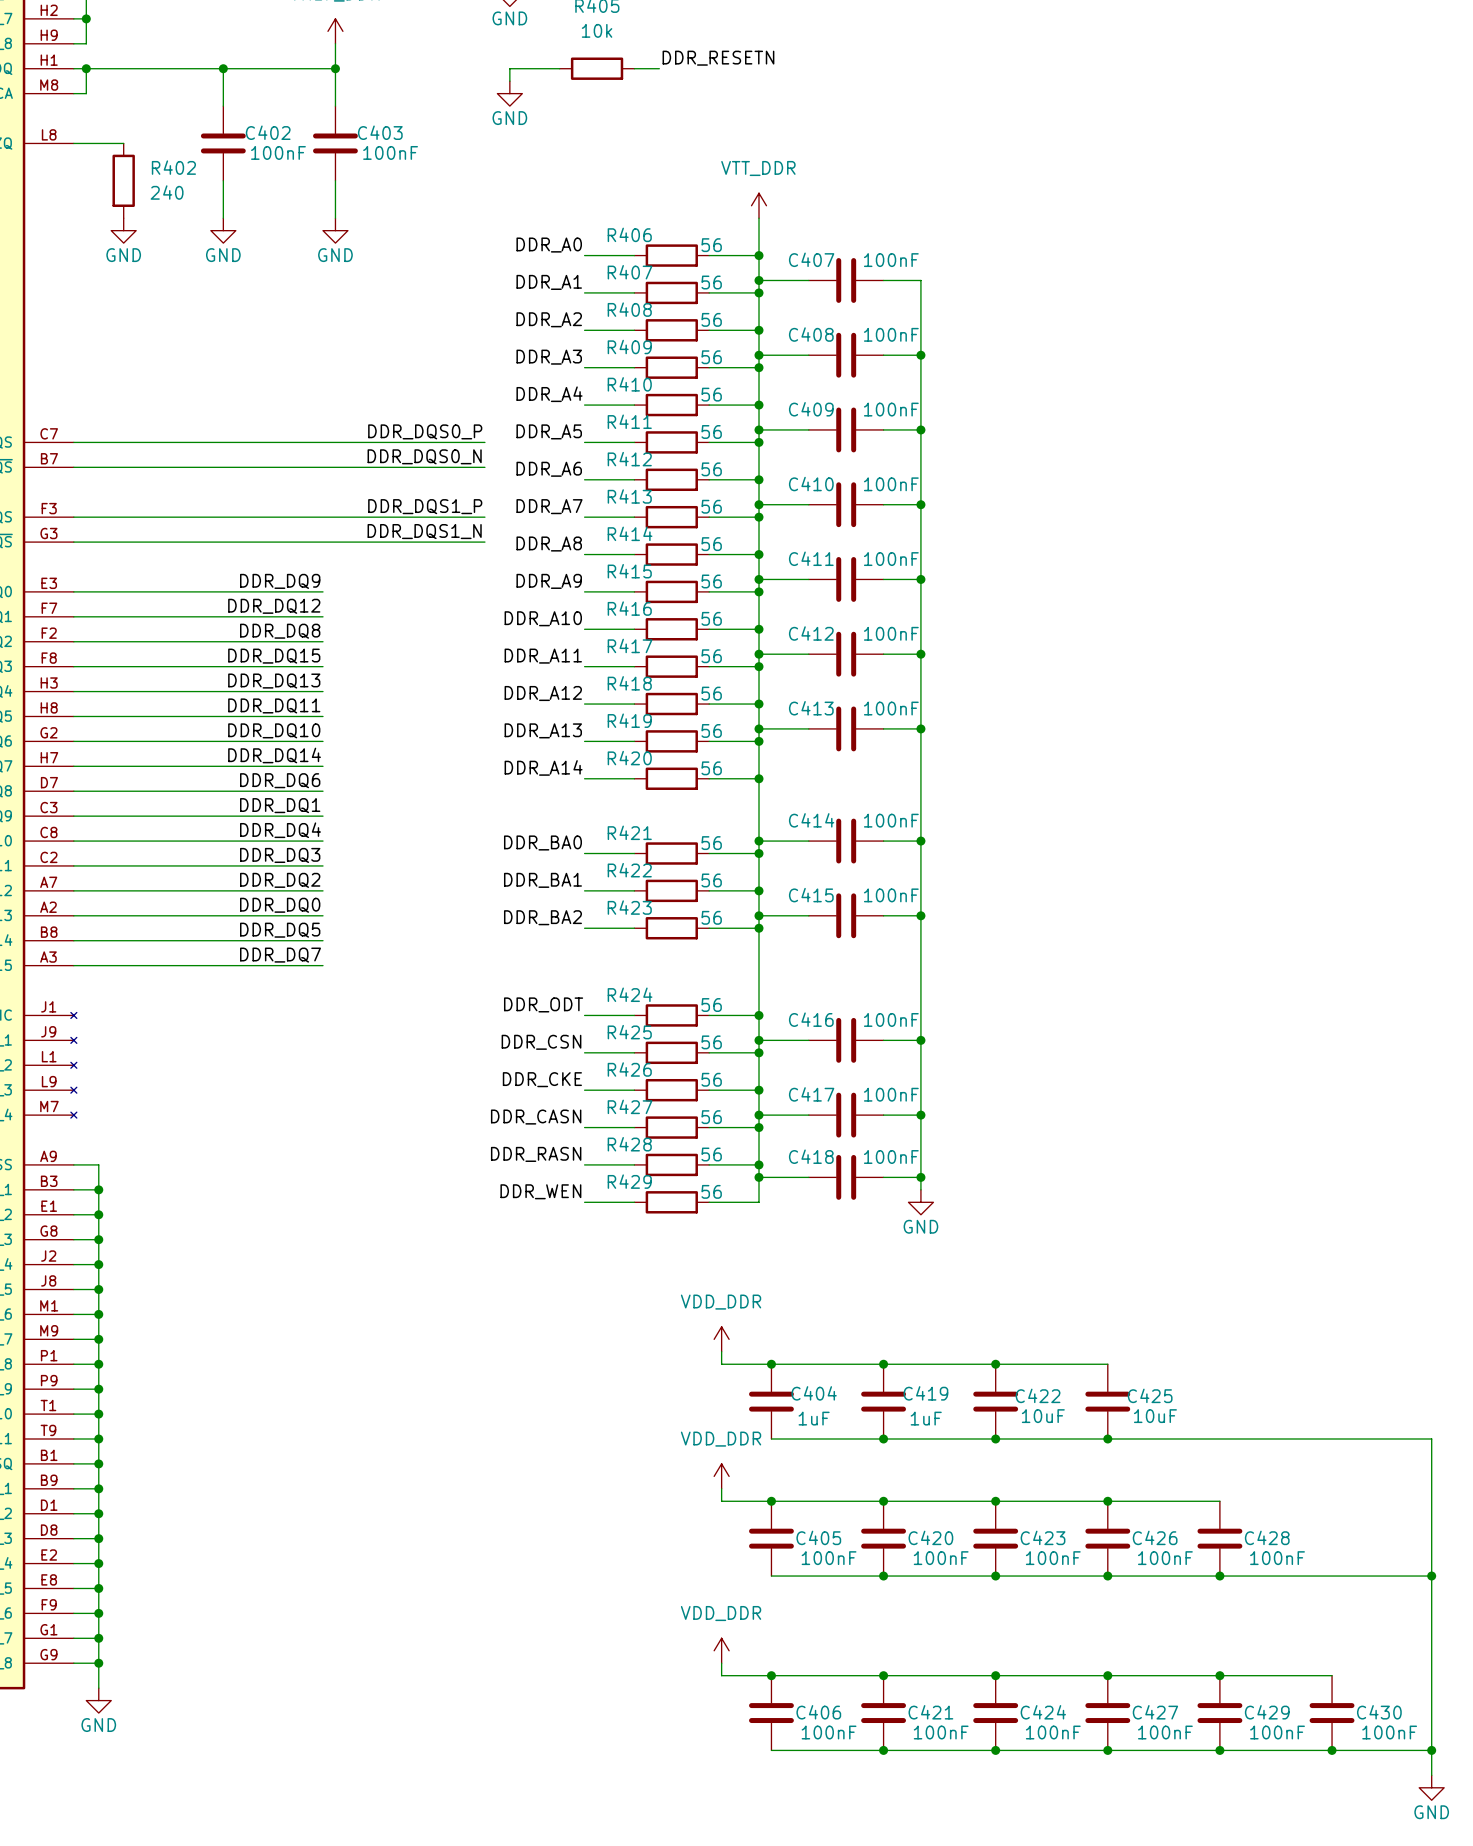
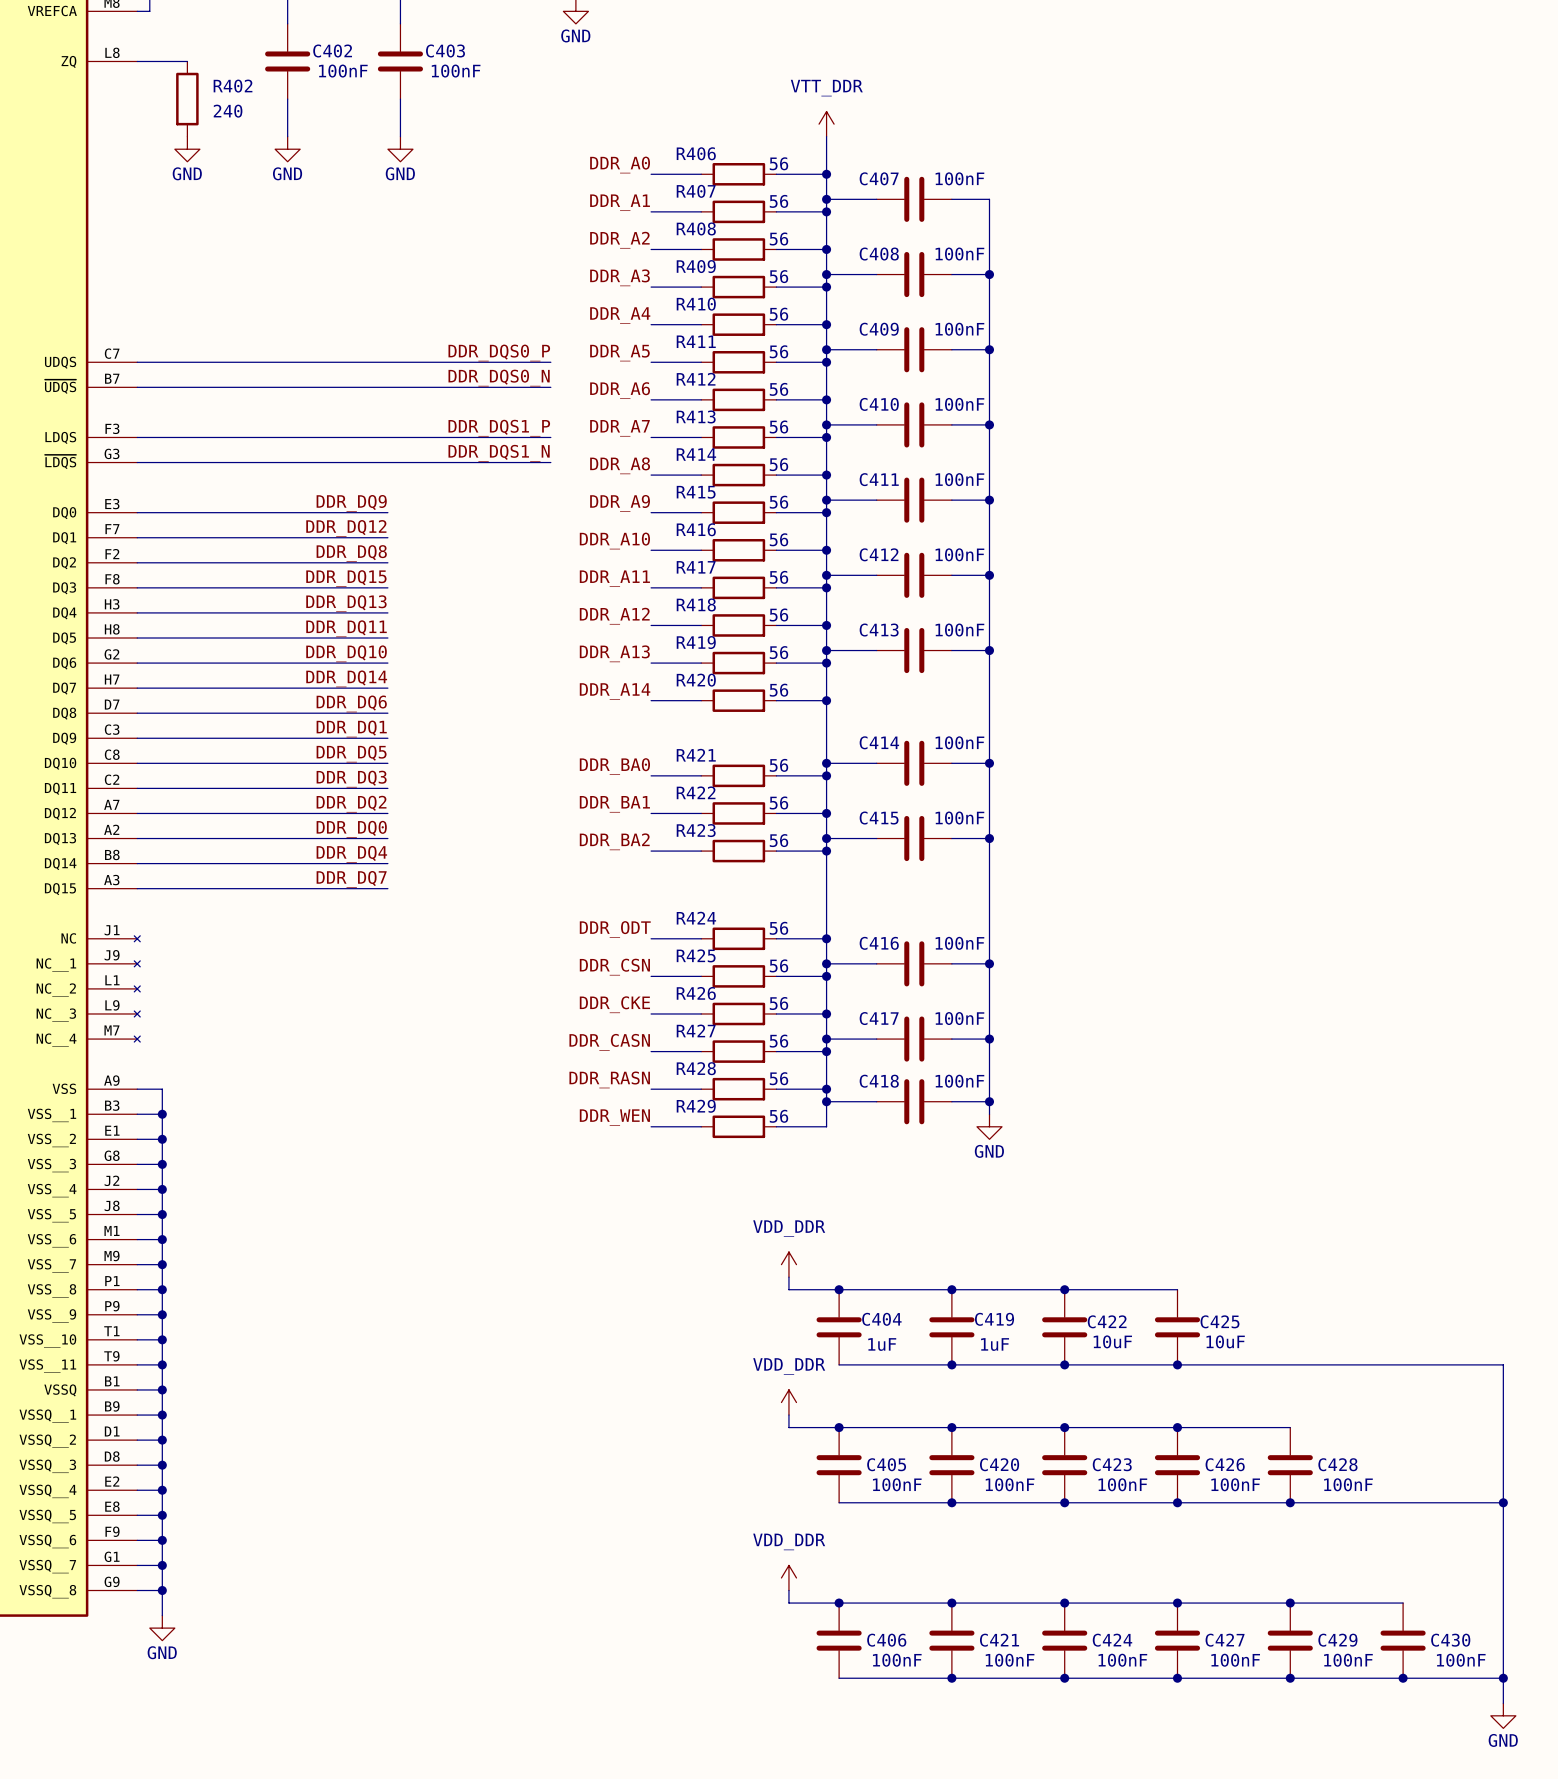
label: DDR_DQ4 (280, 830) -> DDR_DQ5 (351, 754)
label: DDR_DQ5 (280, 930) -> DDR_DQ4 (351, 854)

